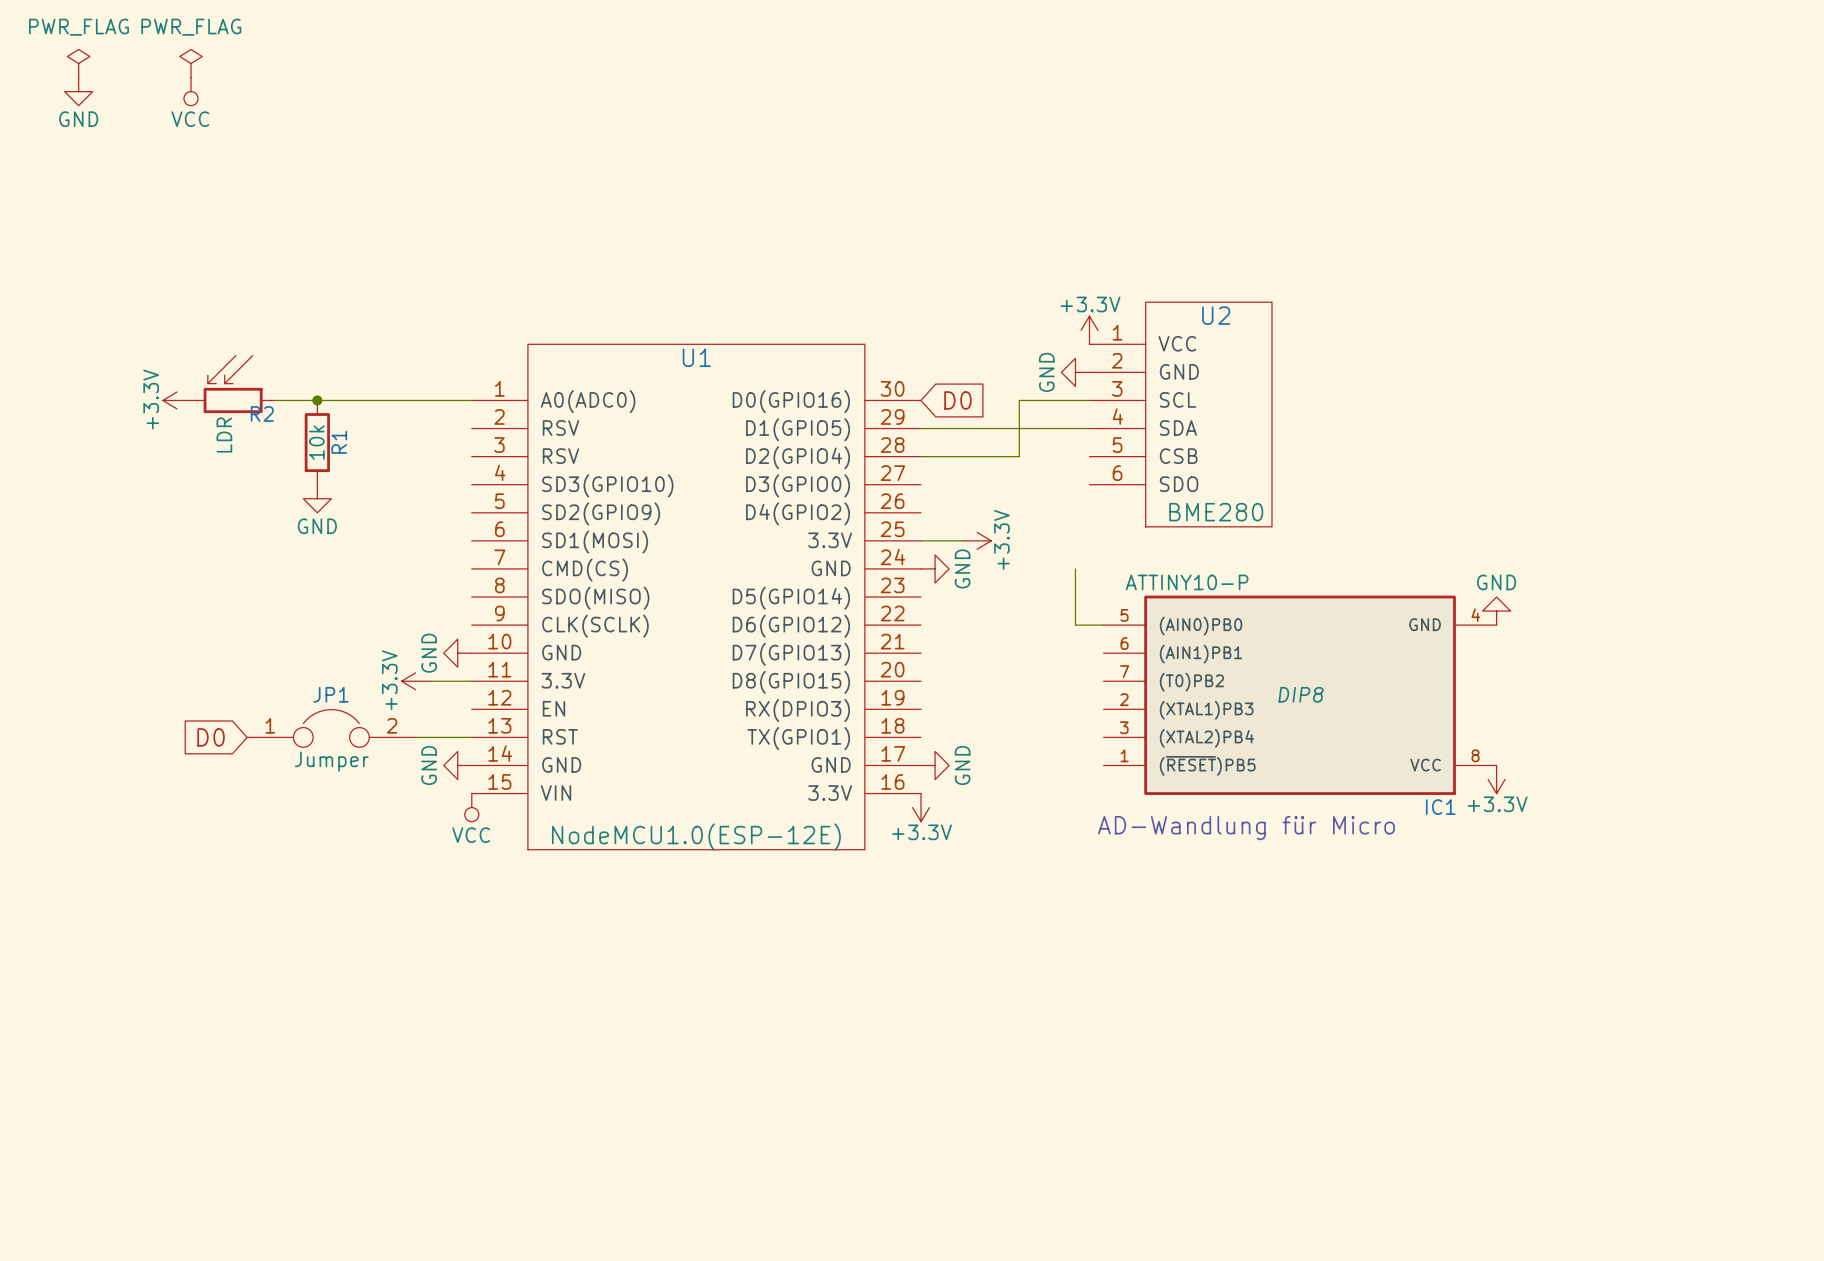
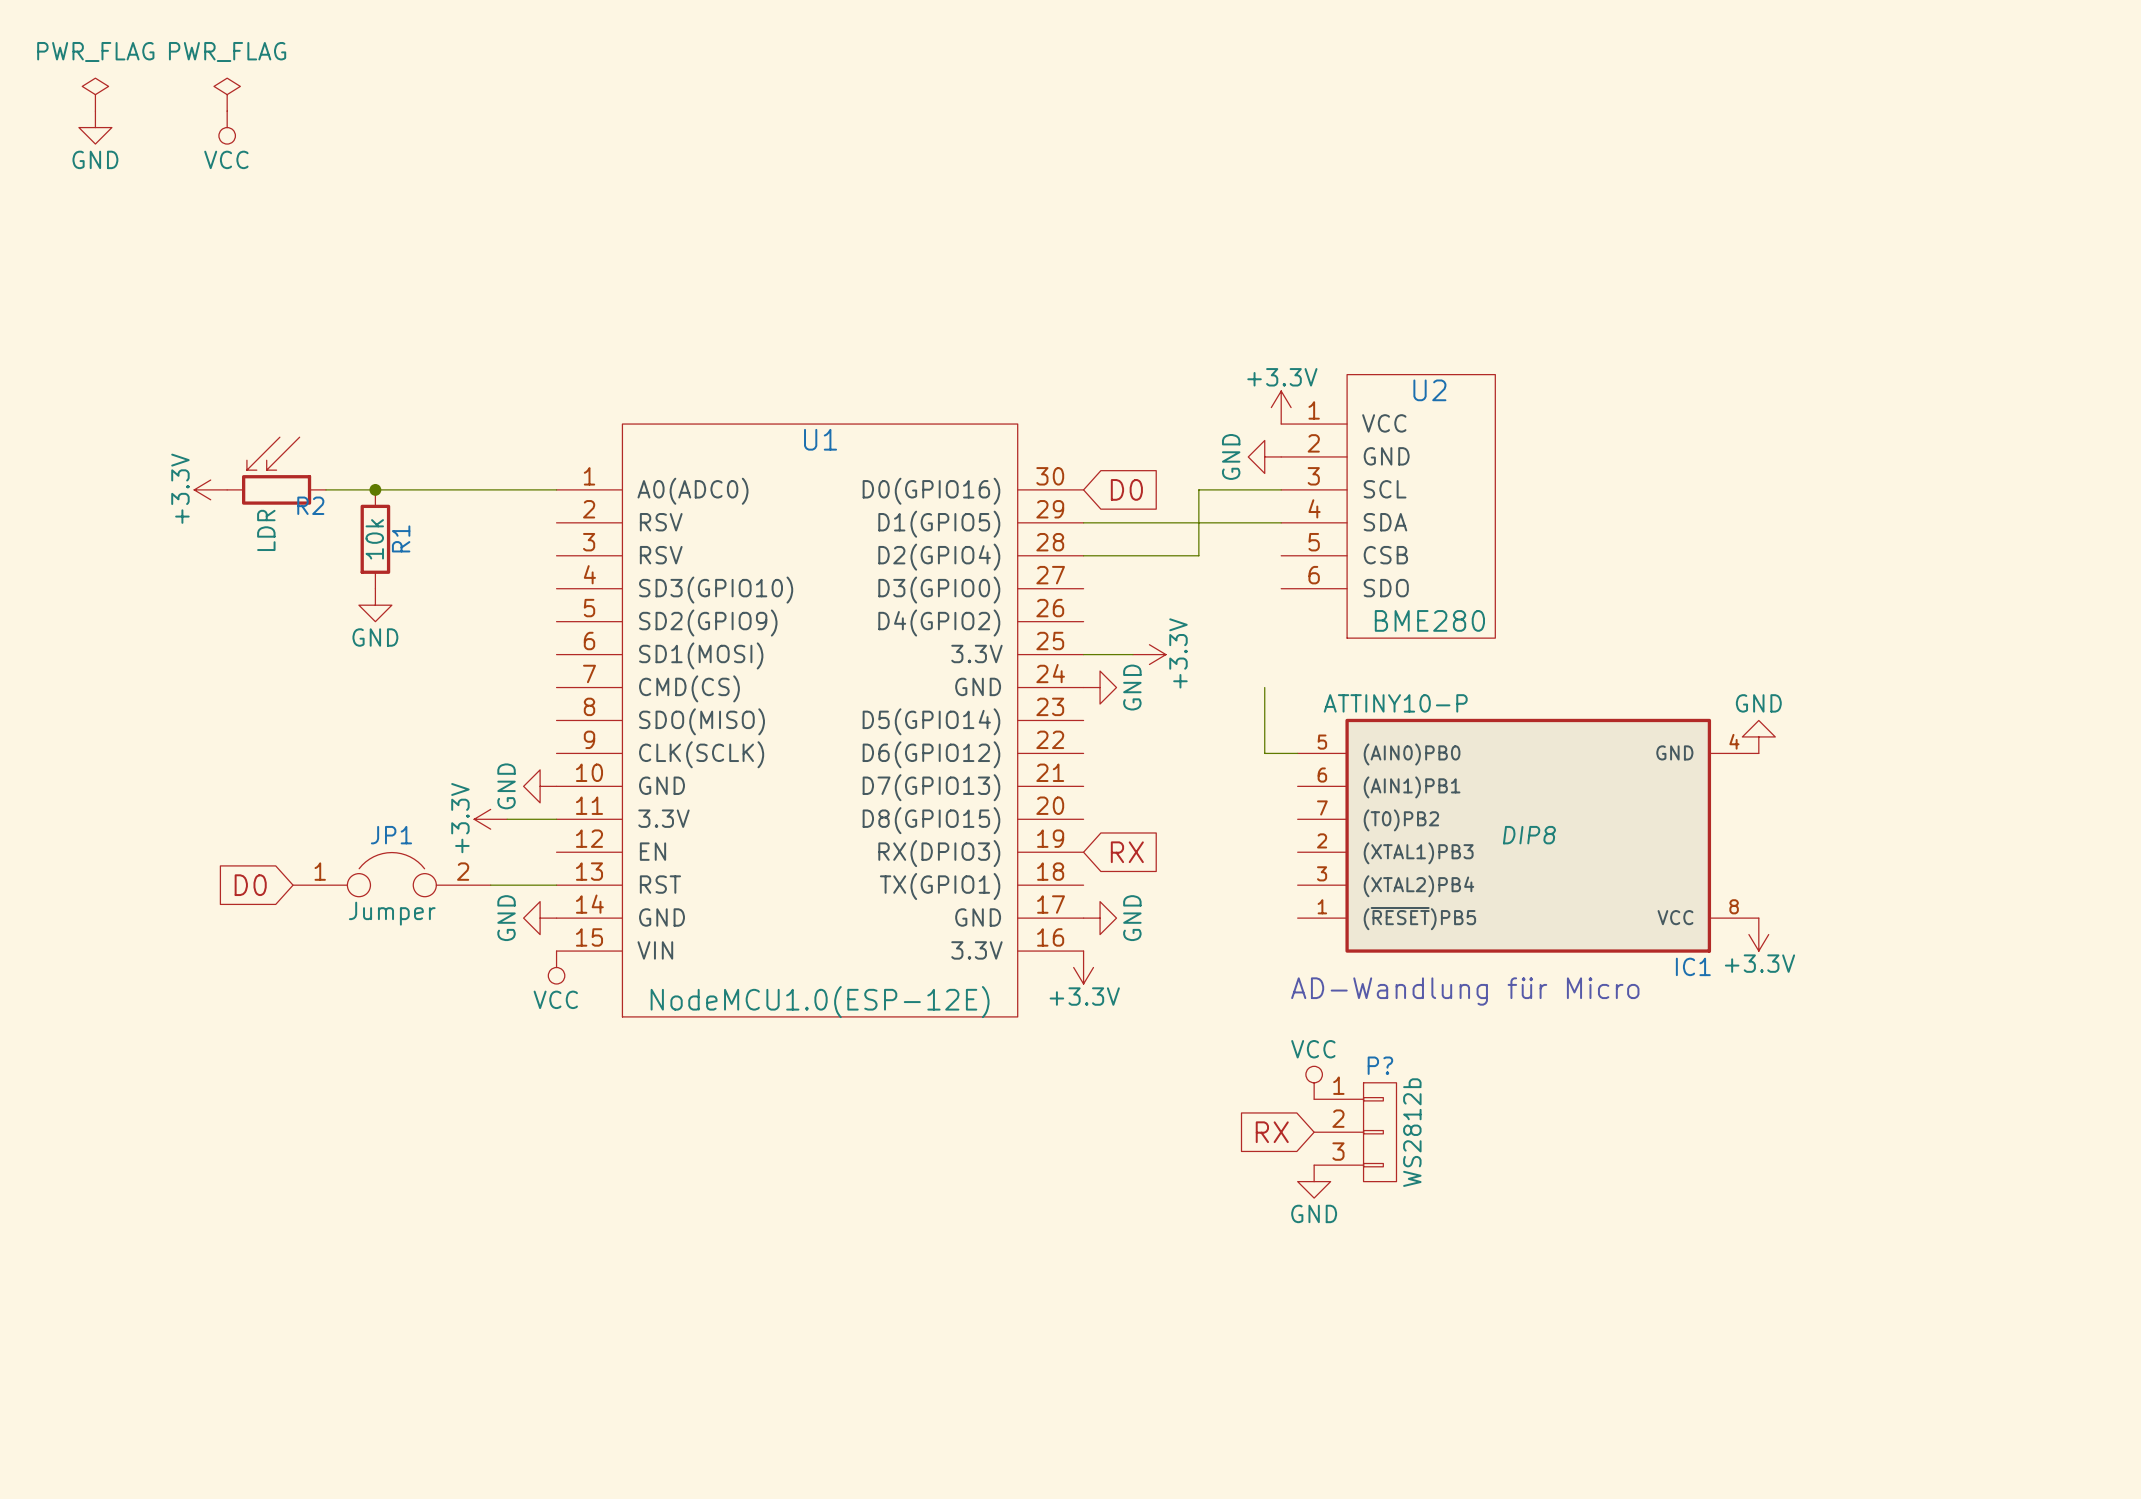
global label: none -> RX (1127, 852)
power symbol: none -> VCC (1314, 1082)
global label: none -> RX (1272, 1132)
P?: none -> WS2812b (1355, 1132)
power symbol: none -> GND (1314, 1181)

